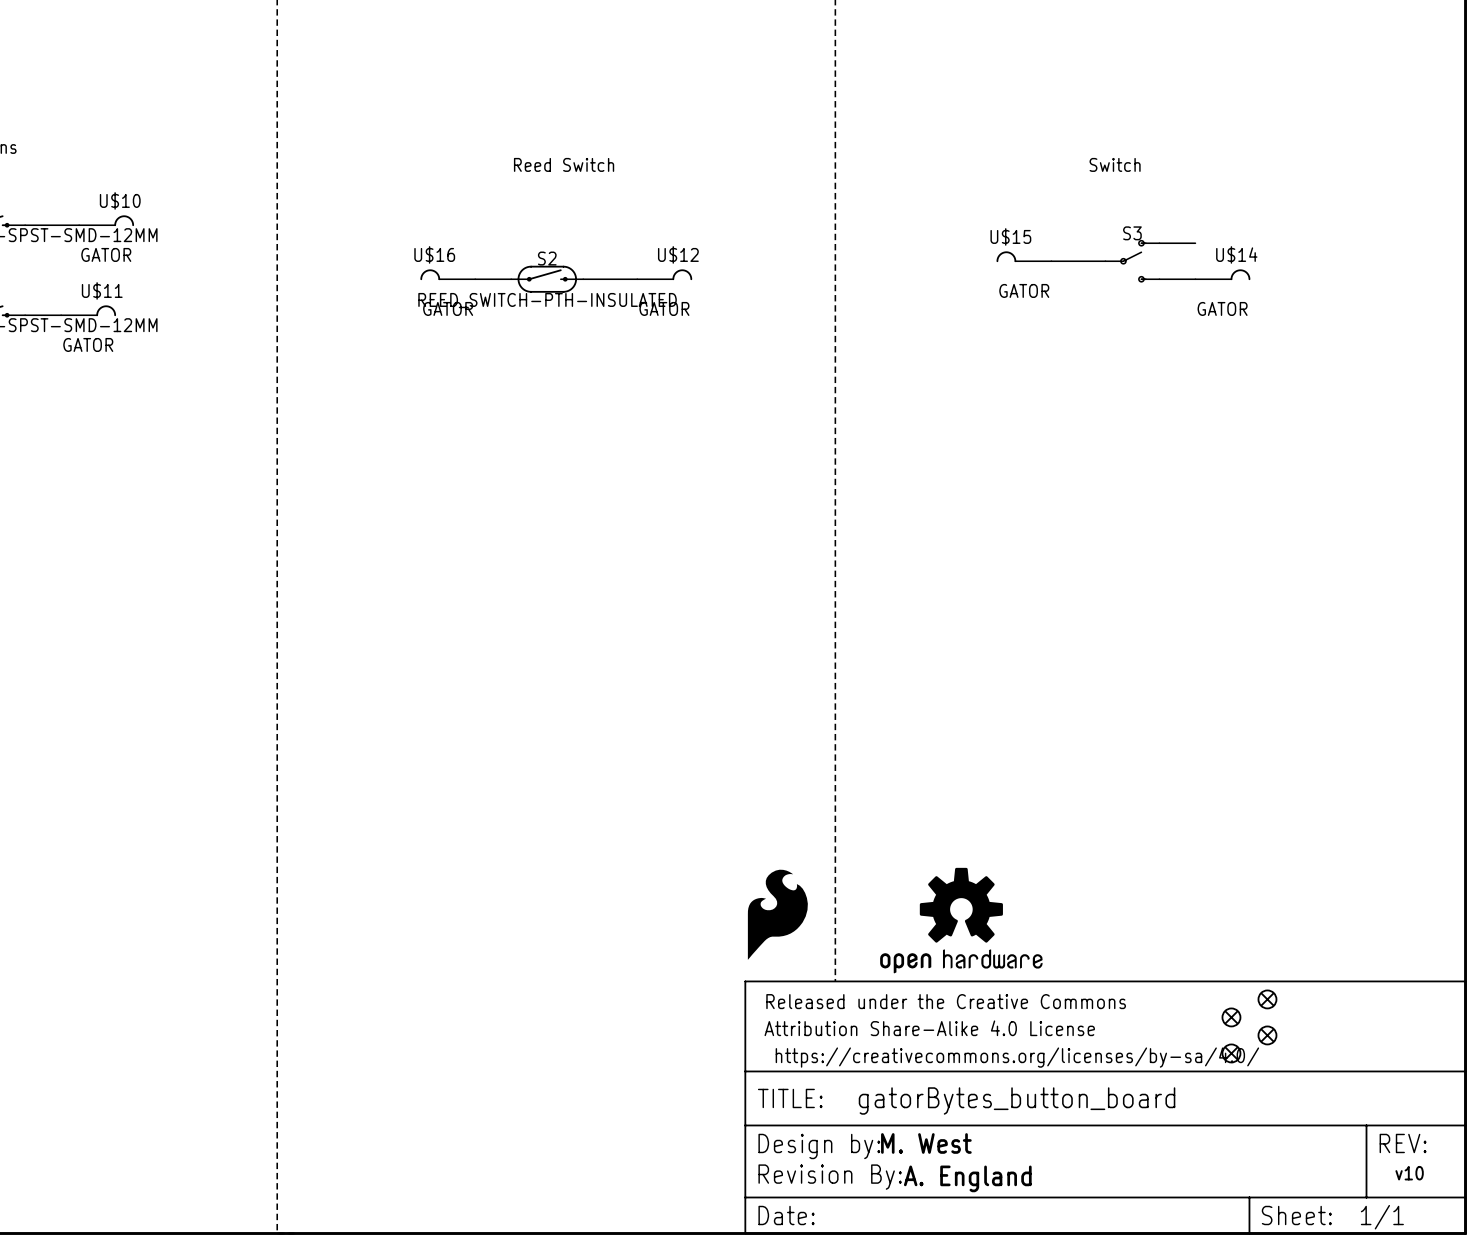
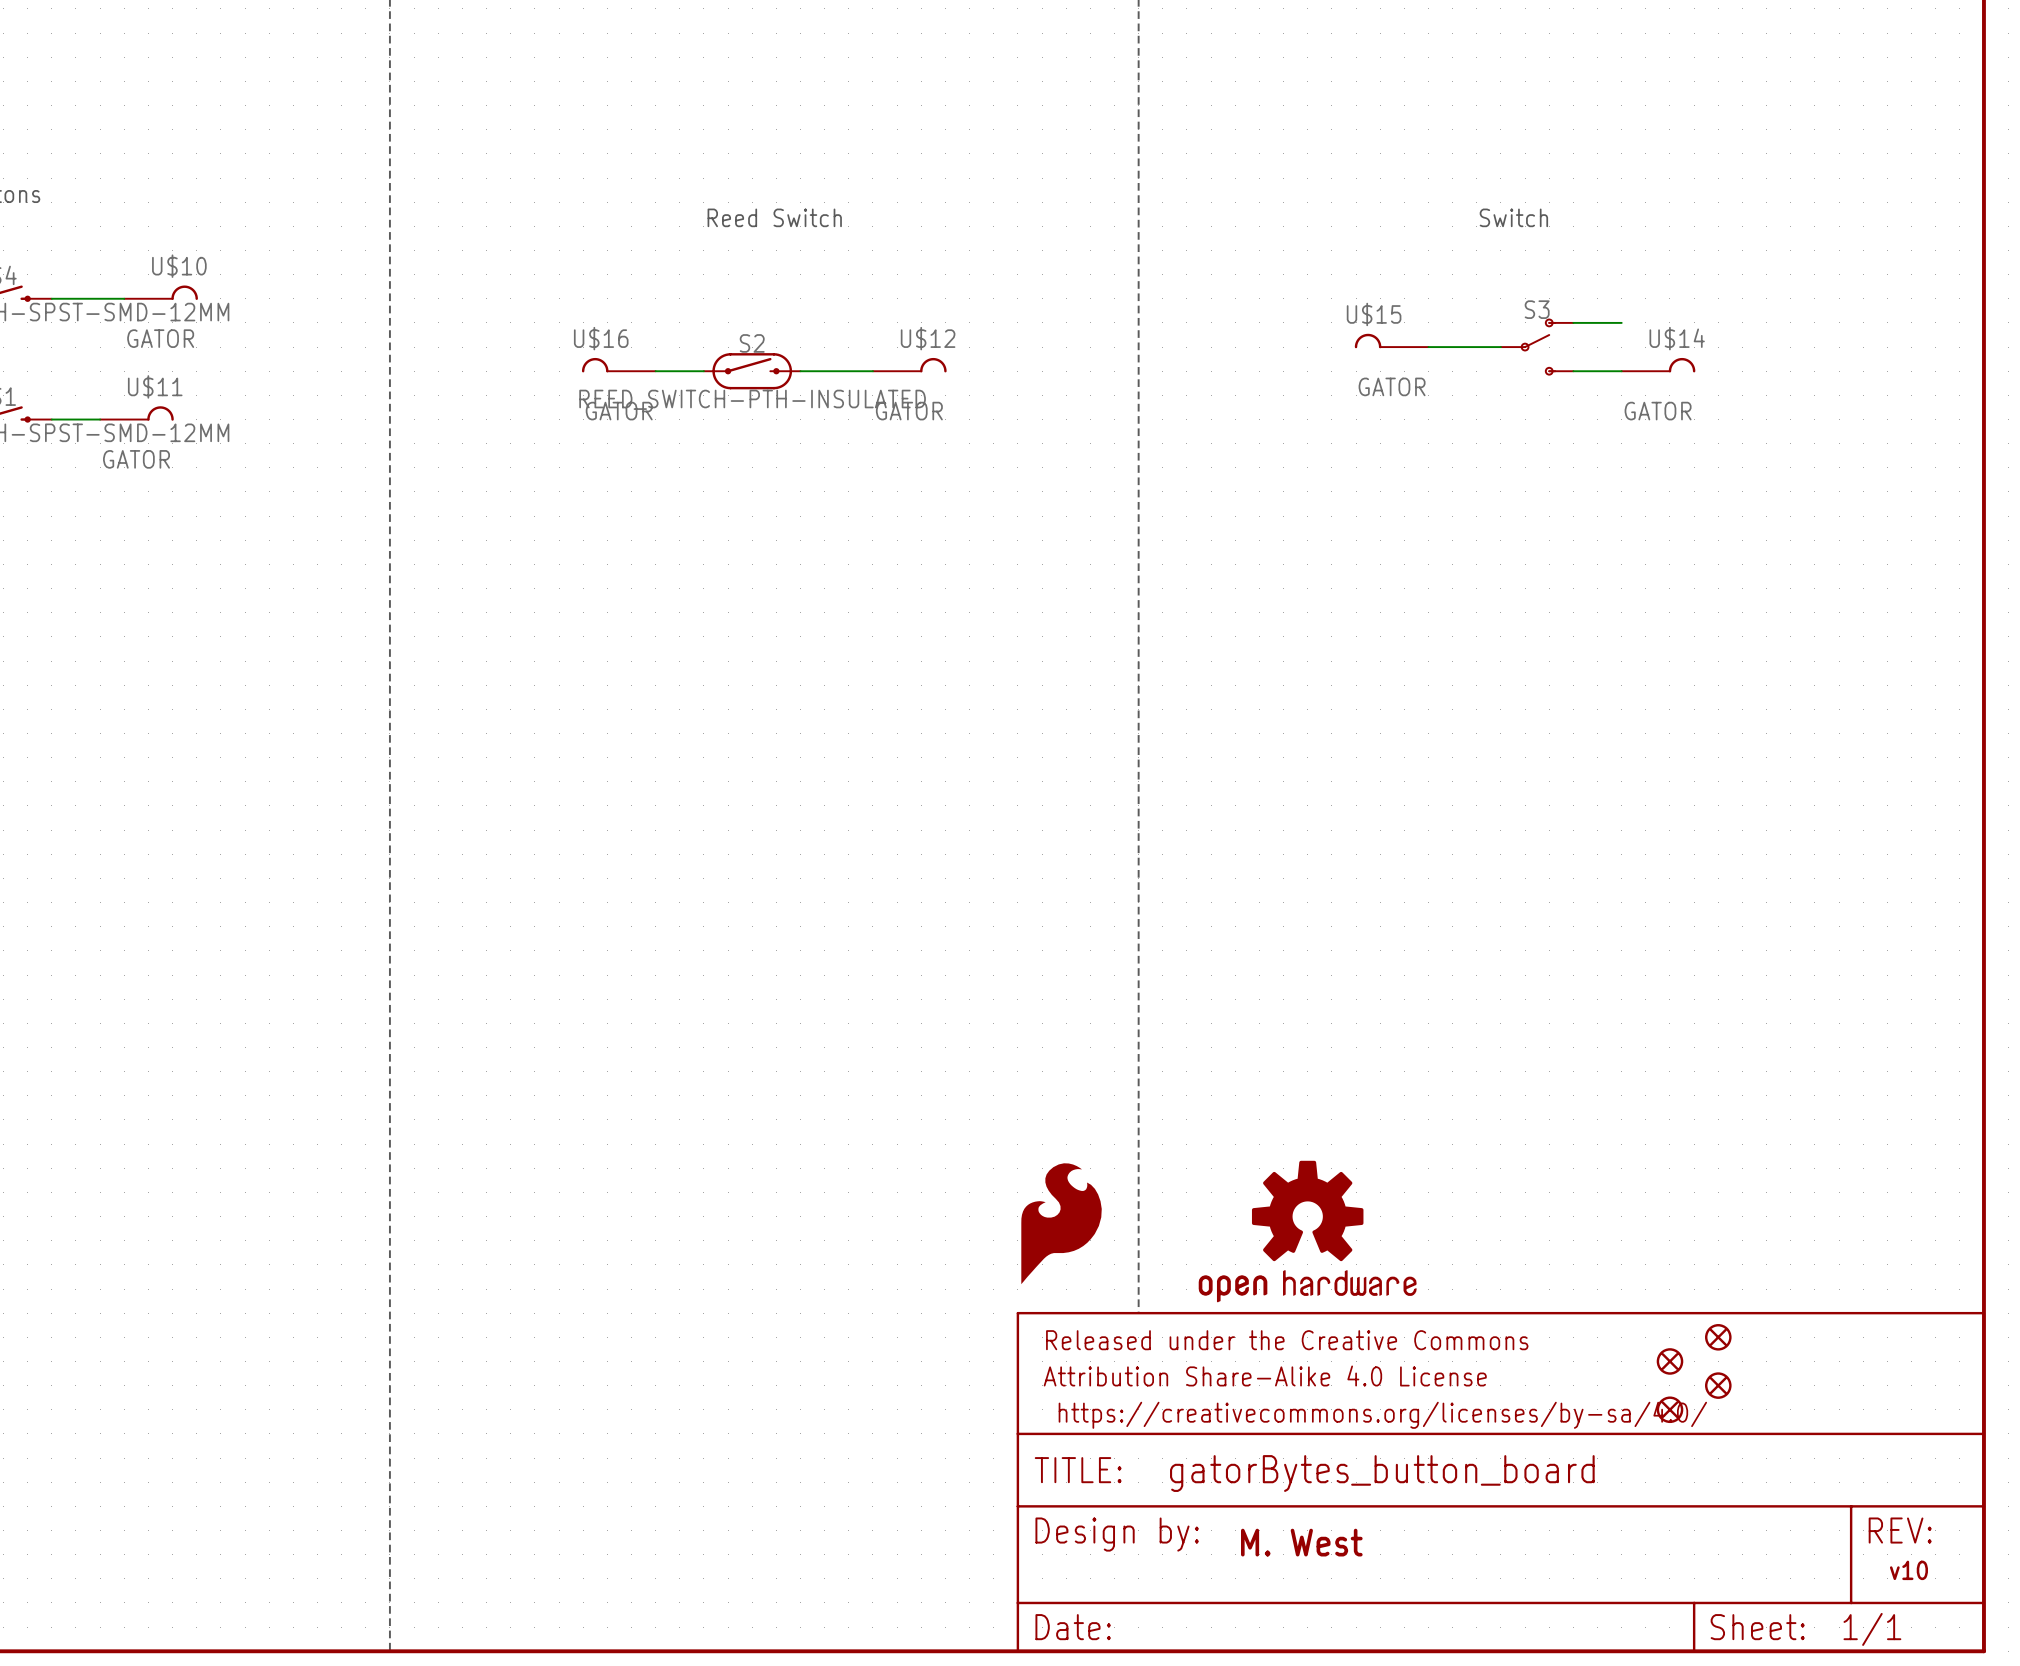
text position: M. West (926, 1143) -> M. West (1301, 1542)
part: (830, 1177) -> none
text: A. England (967, 1178) -> none

